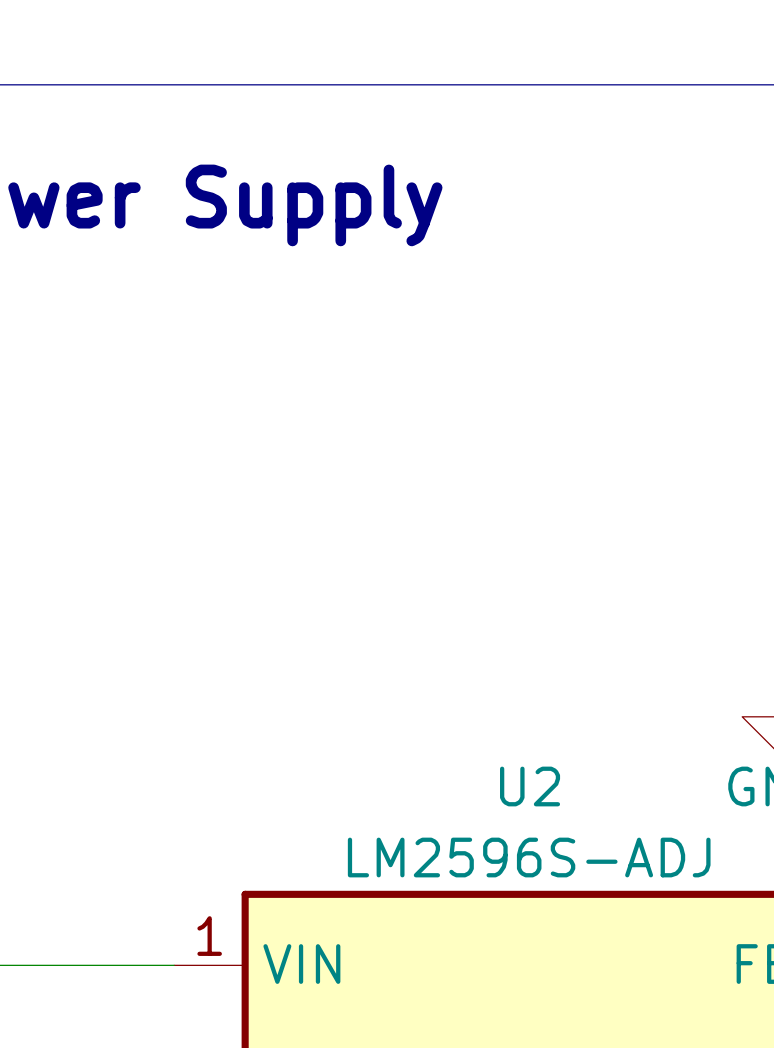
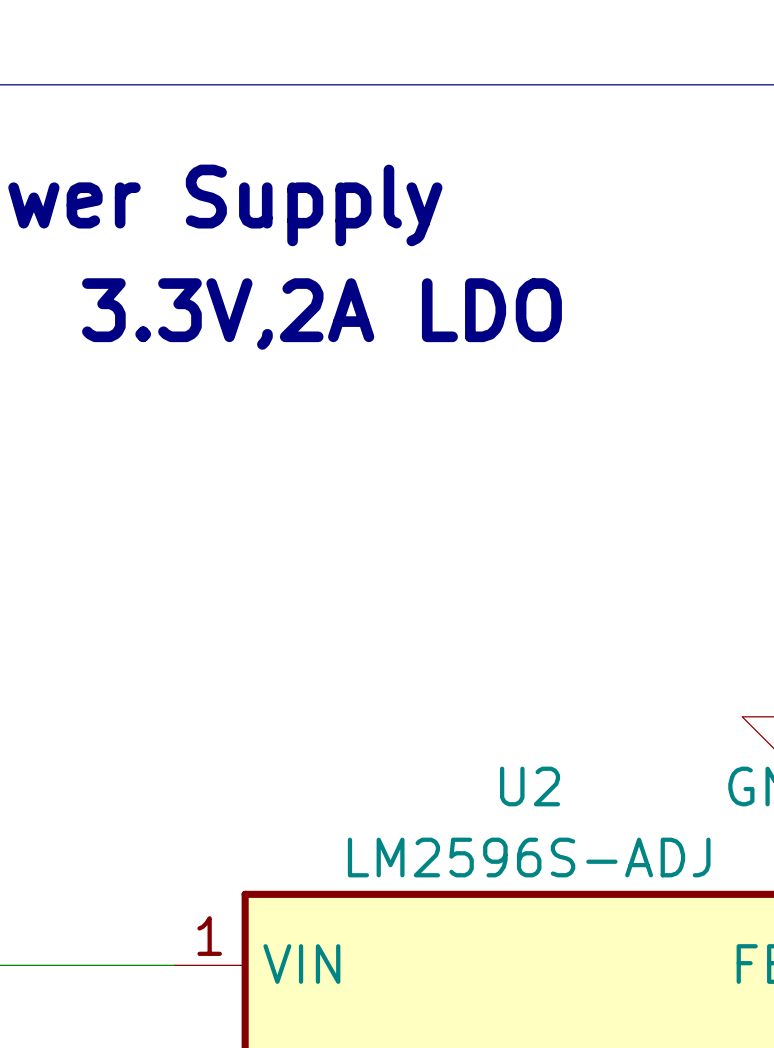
text: none -> 3.3V,2A LDO (322, 313)

